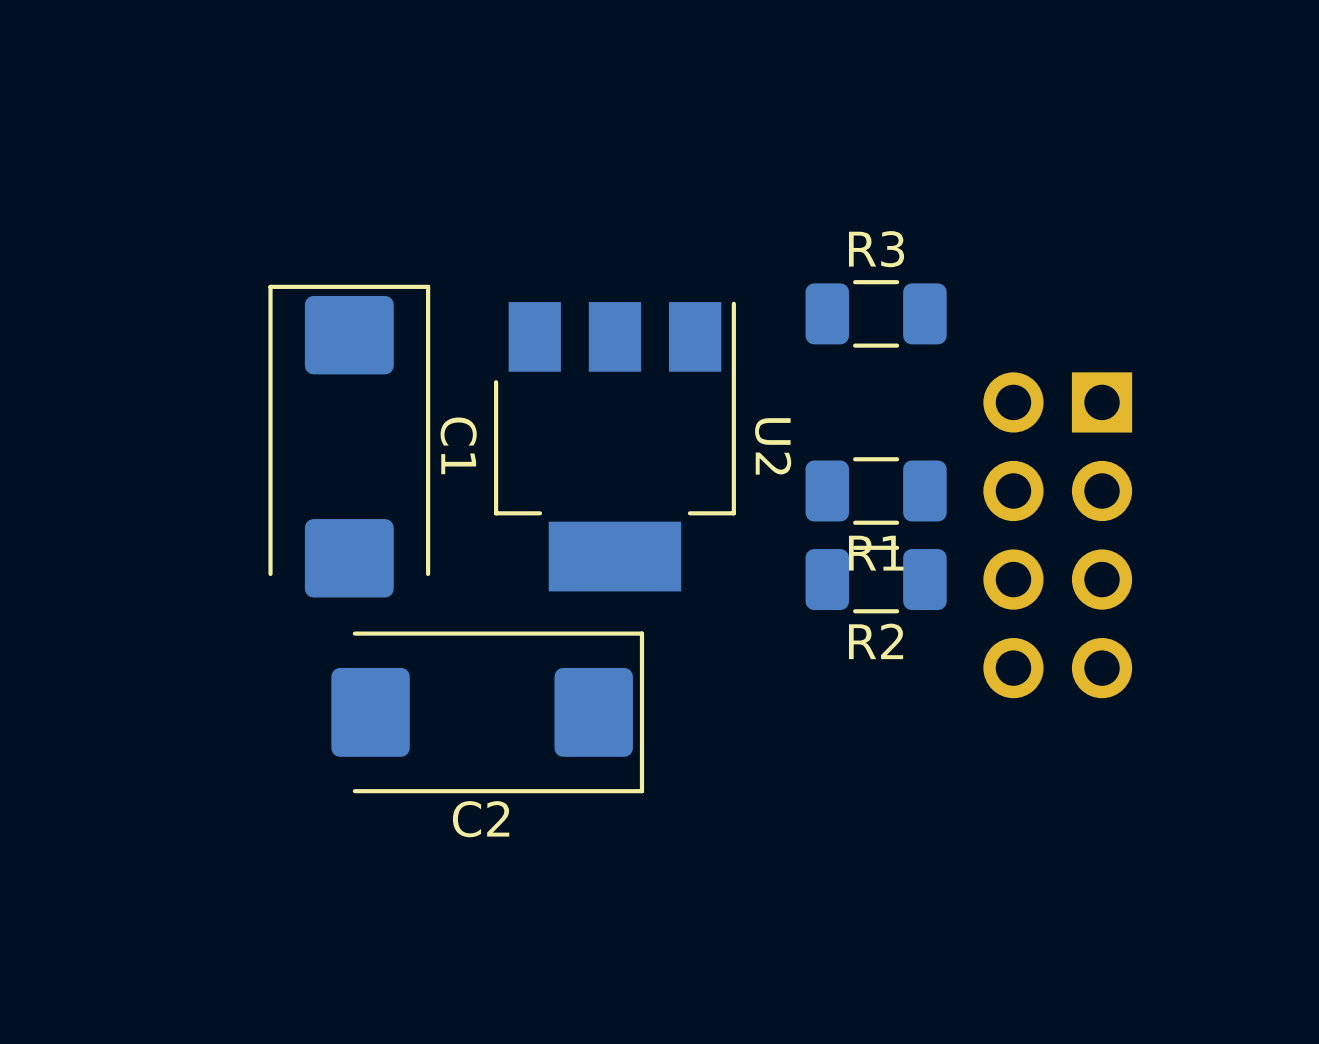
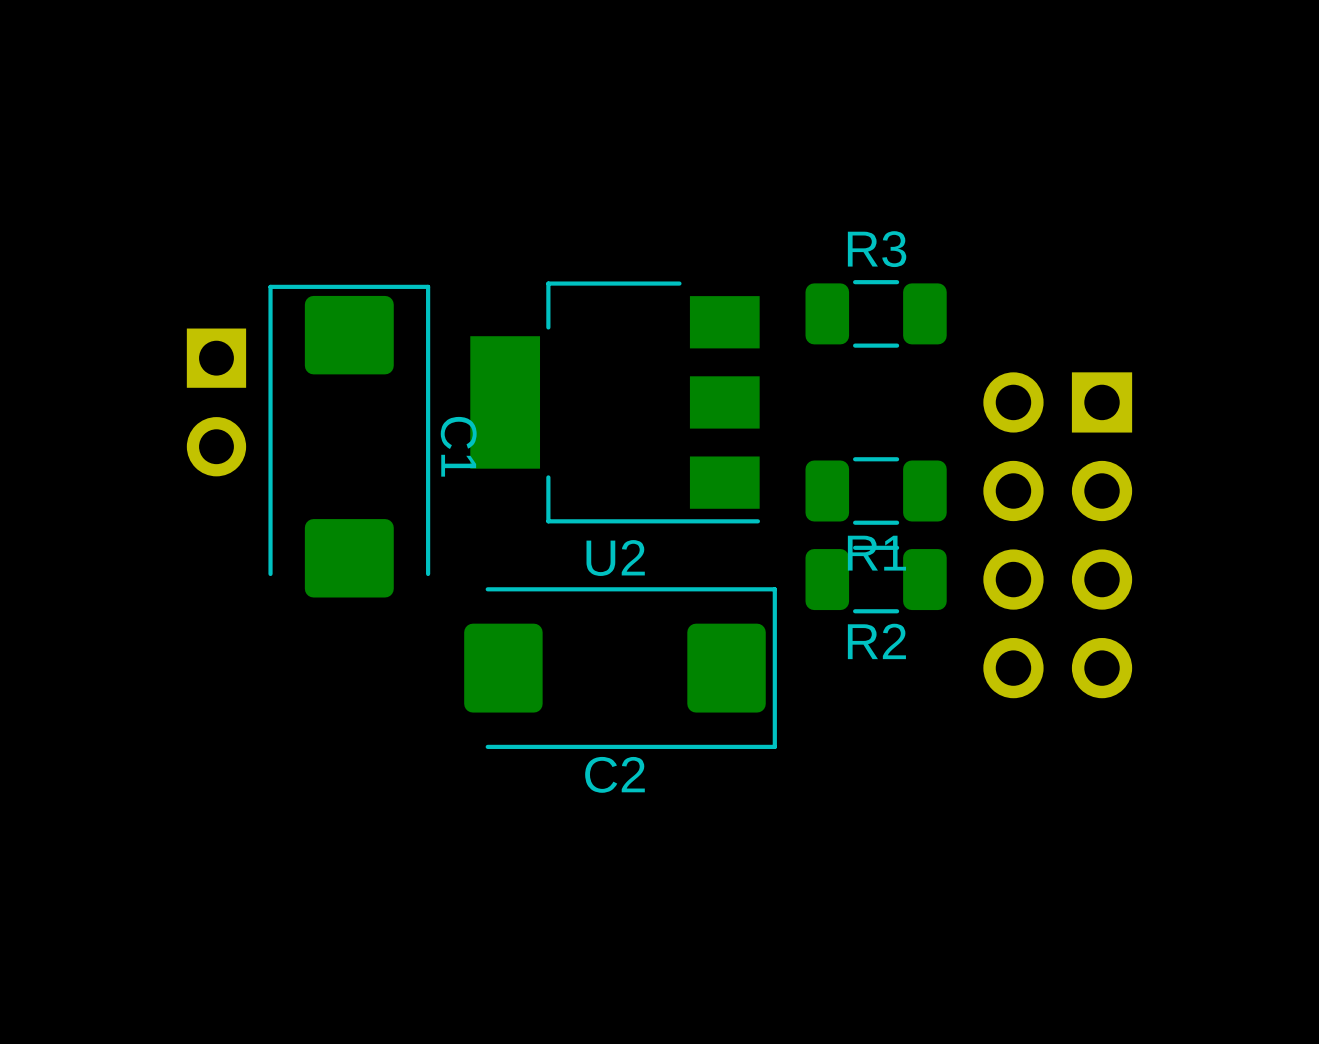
part: none -> (216, 402)
U2 rotation: 0° (614, 446) -> 90° clockwise (615, 402)
C2 position: (487, 712) -> (620, 668)

